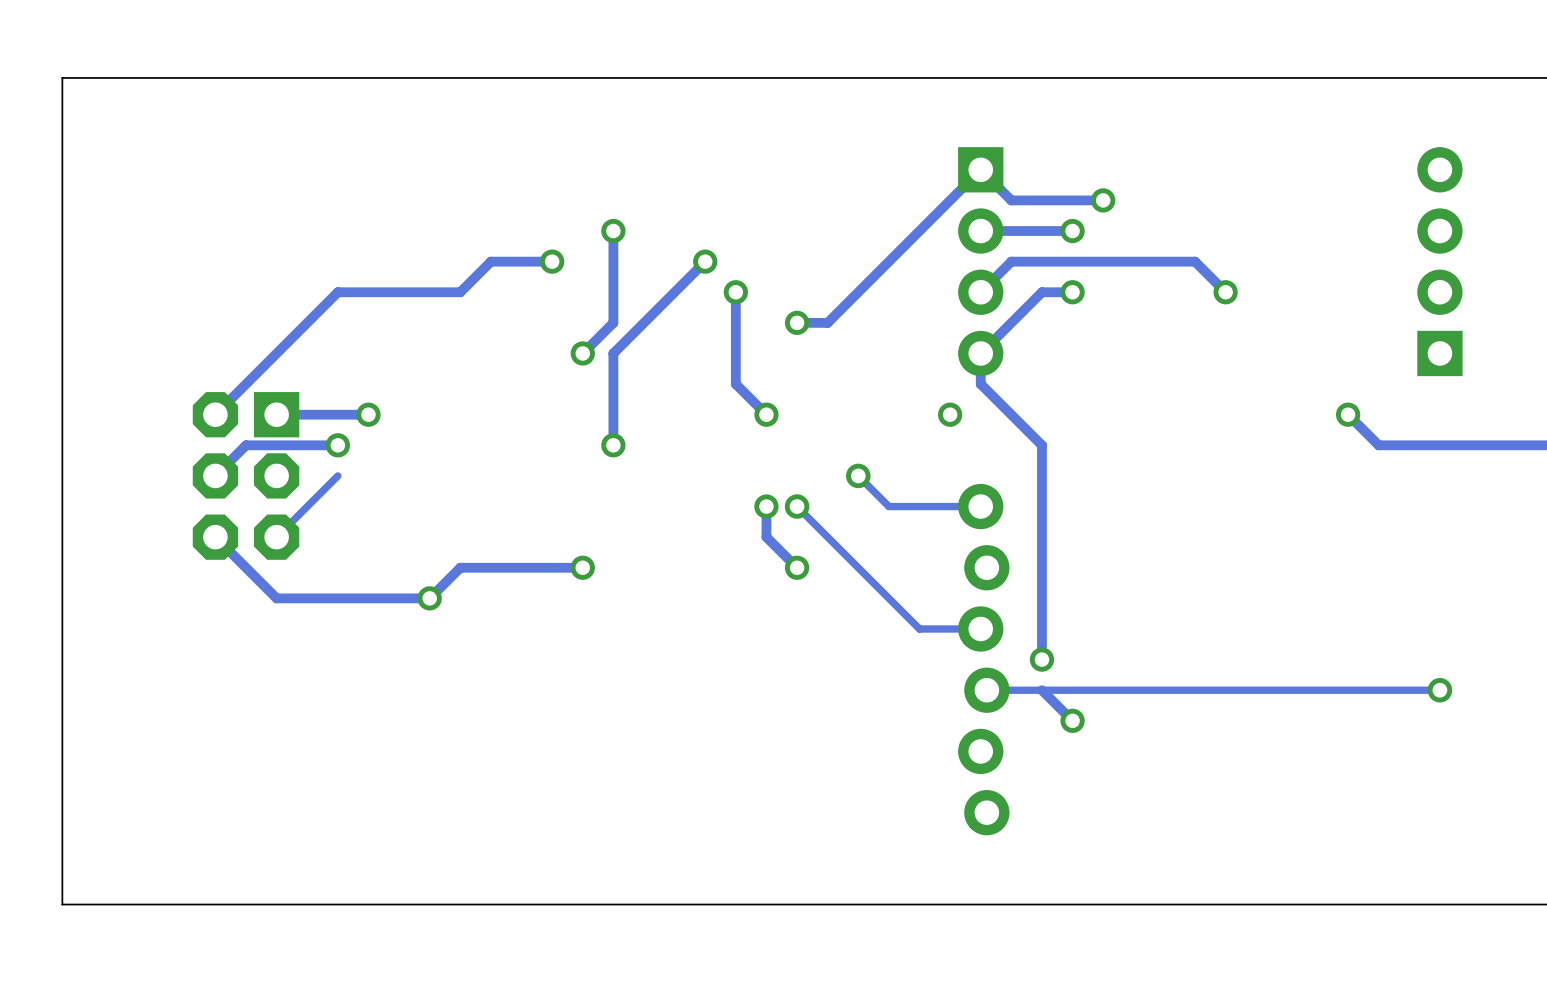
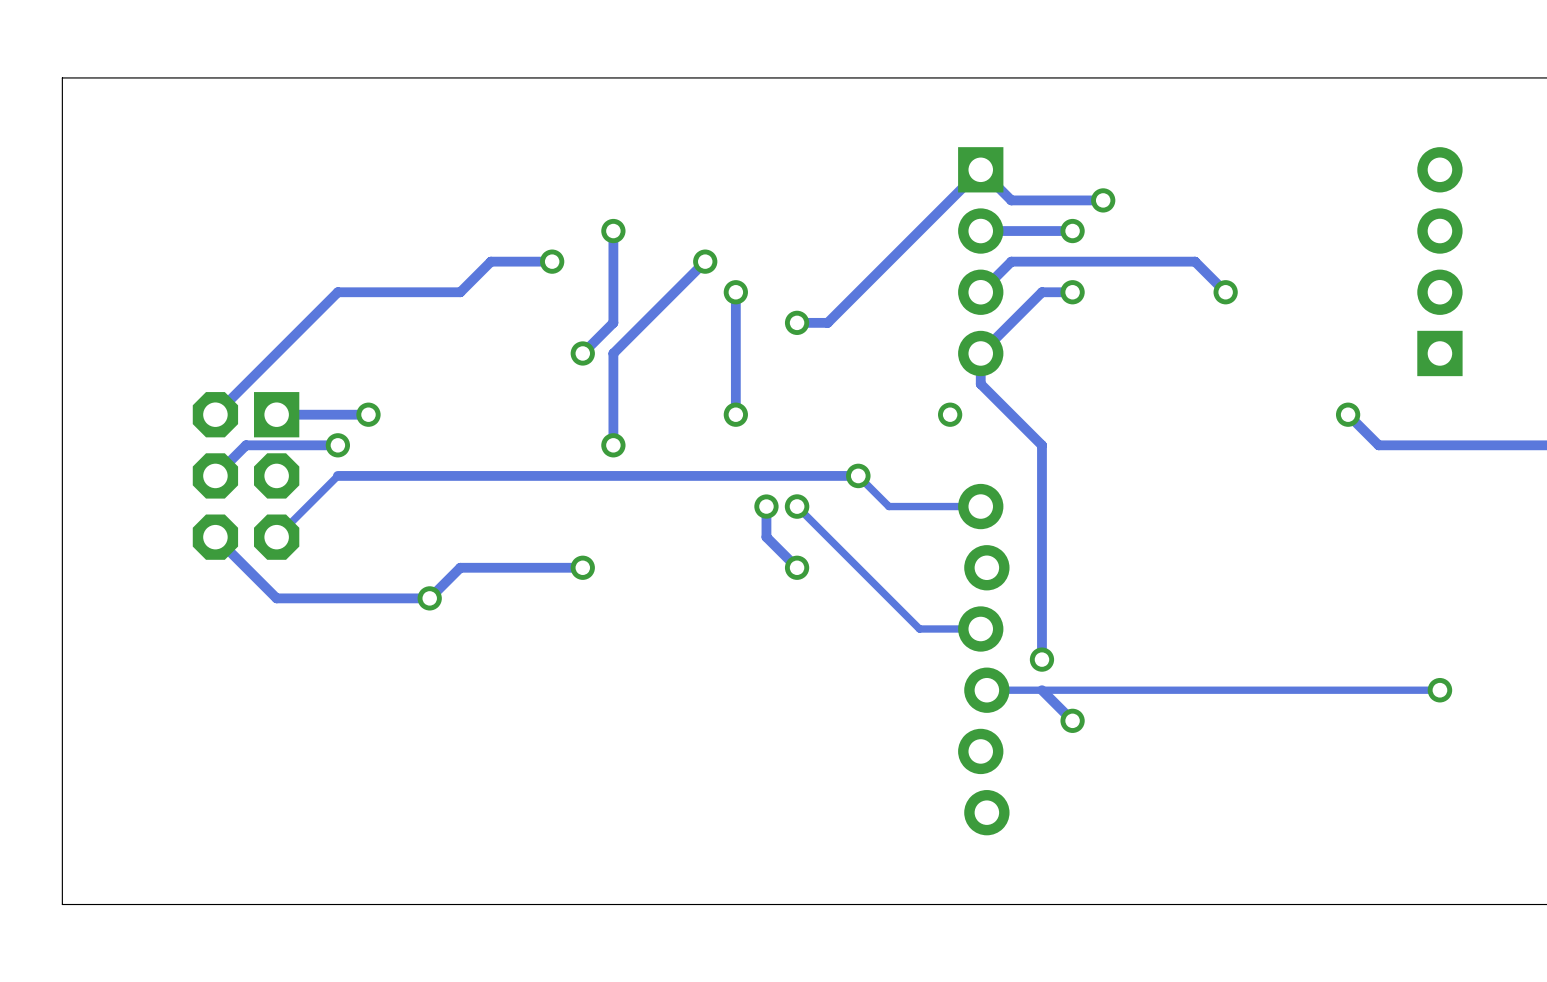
track: (735, 384) (766, 414) -> (735, 384) (735, 414)
via position: (766, 414) -> (735, 414)
track: none -> (858, 475) (337, 475)

